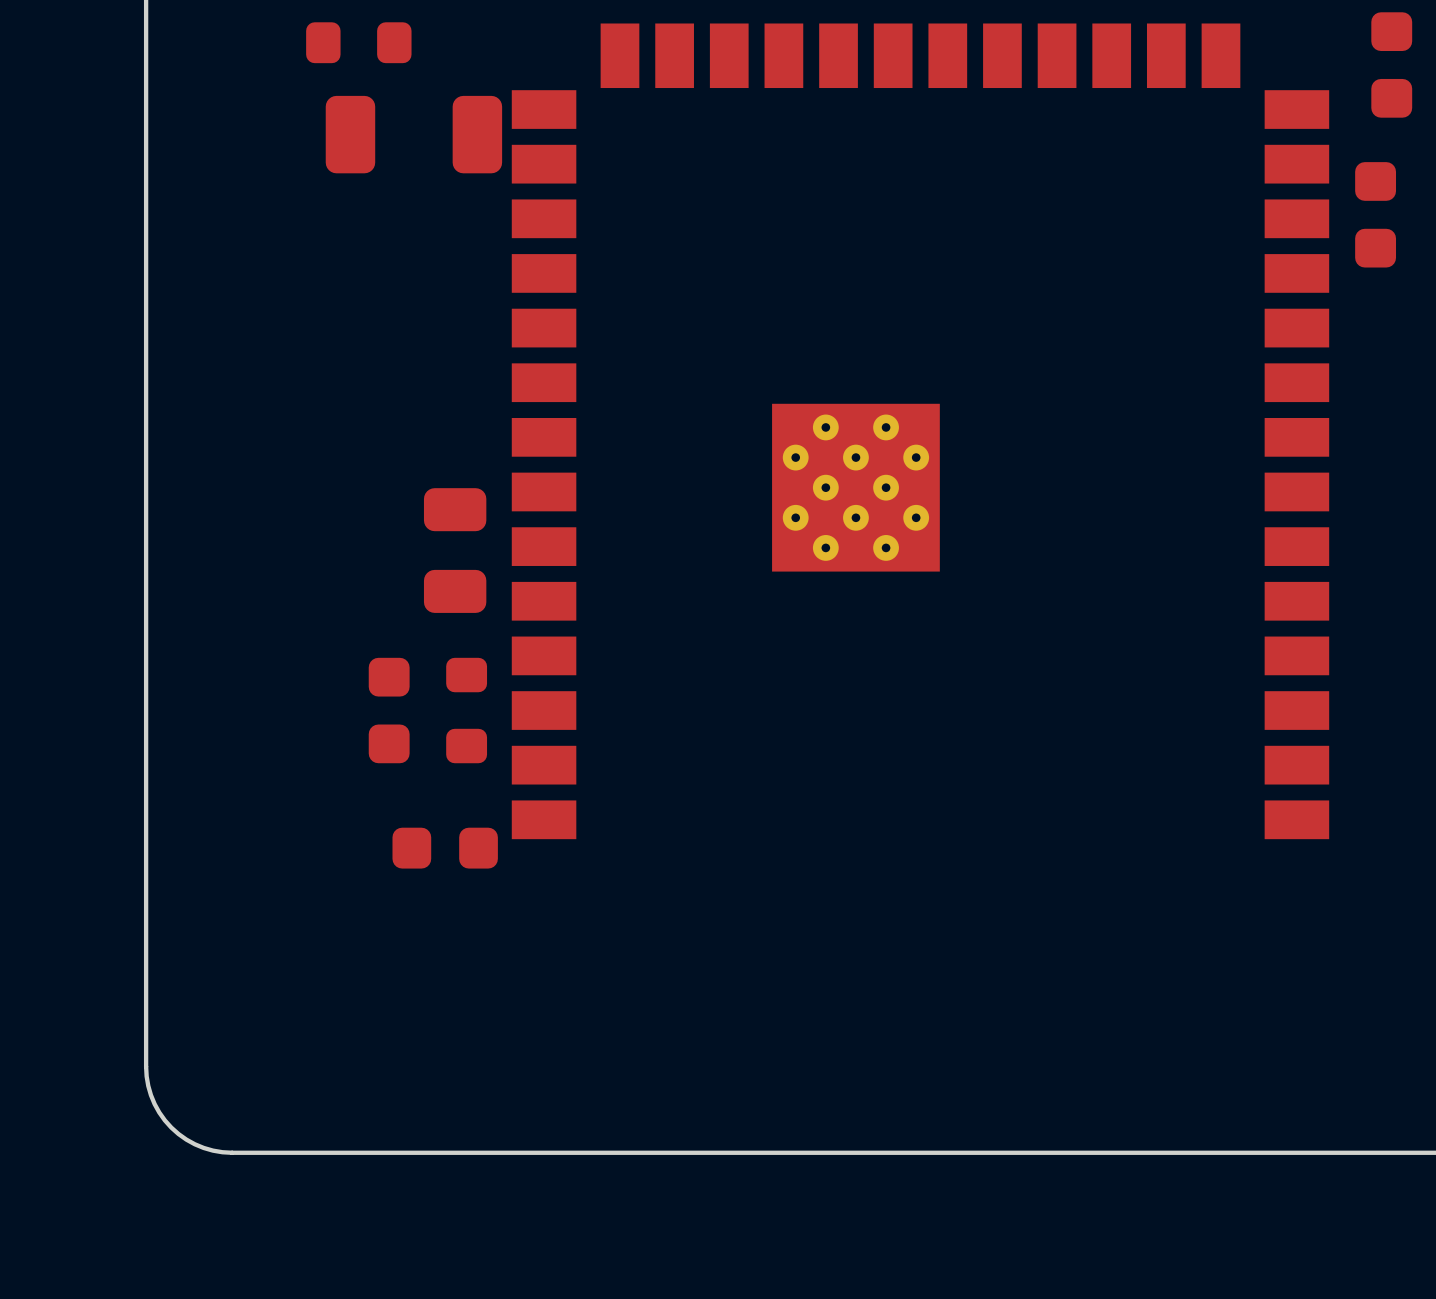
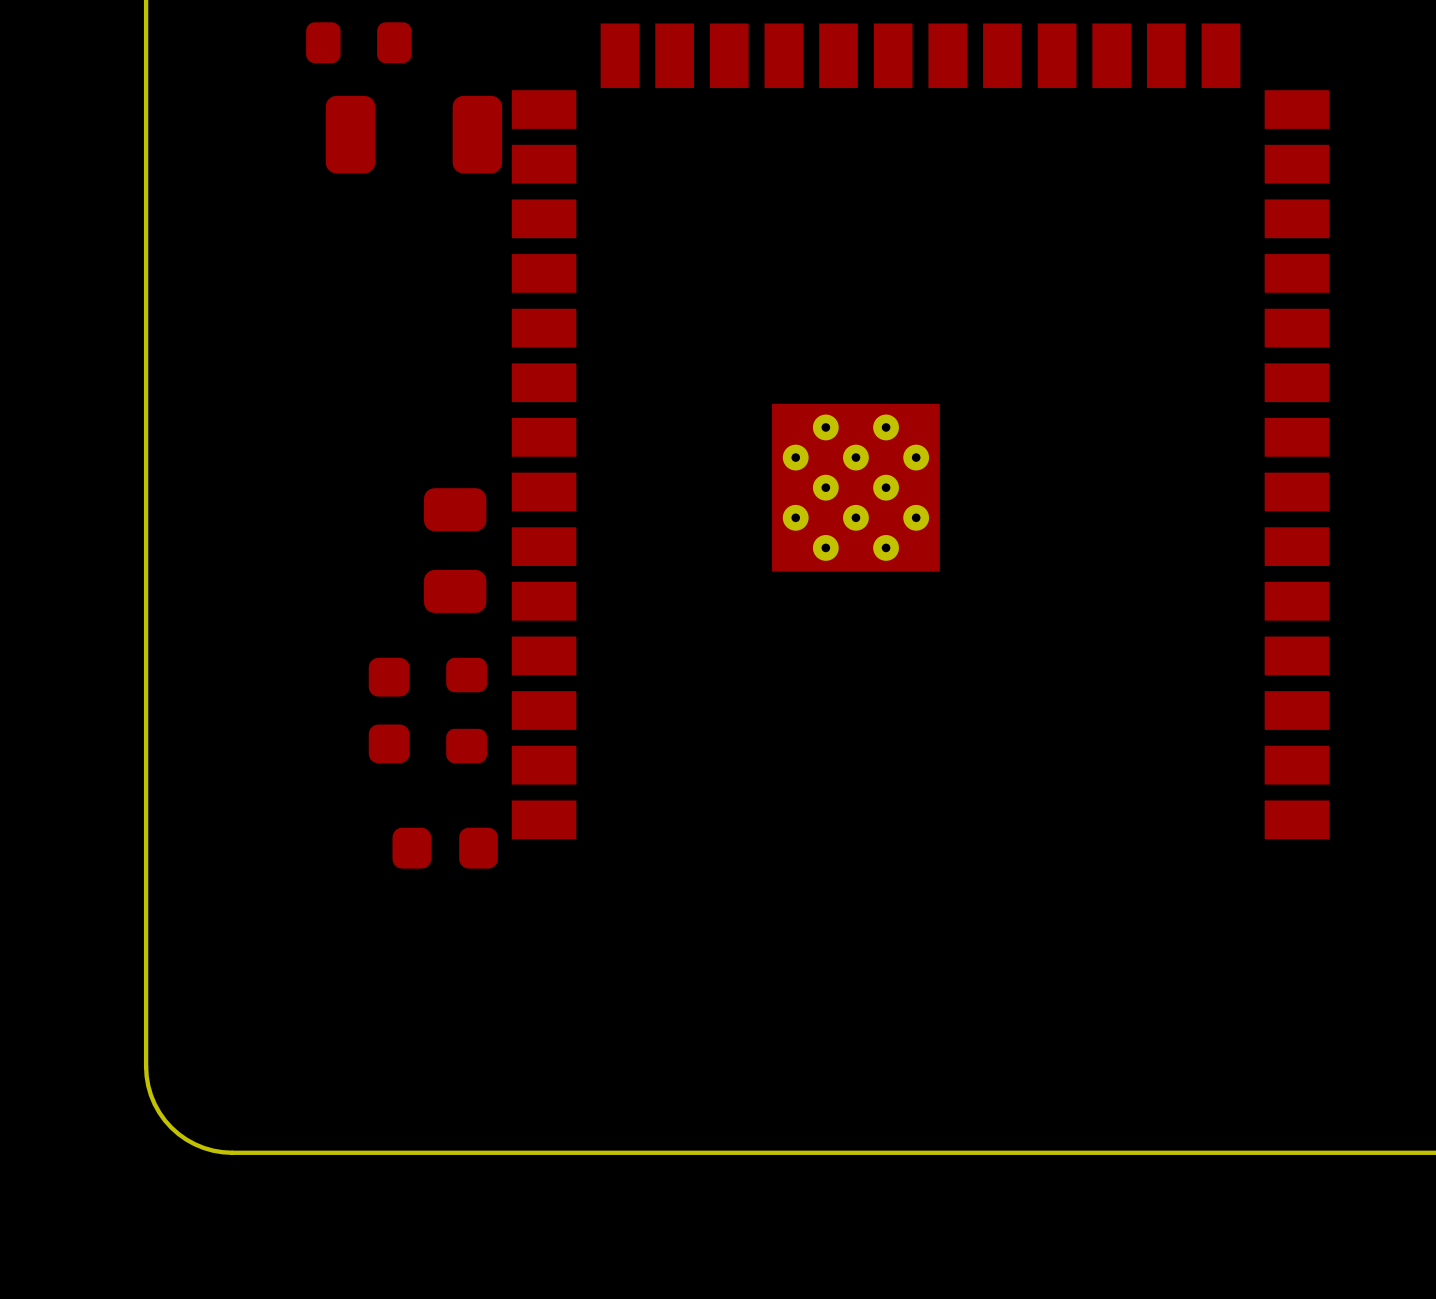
part: (1391, 64) -> none
part: (1375, 214) -> none

